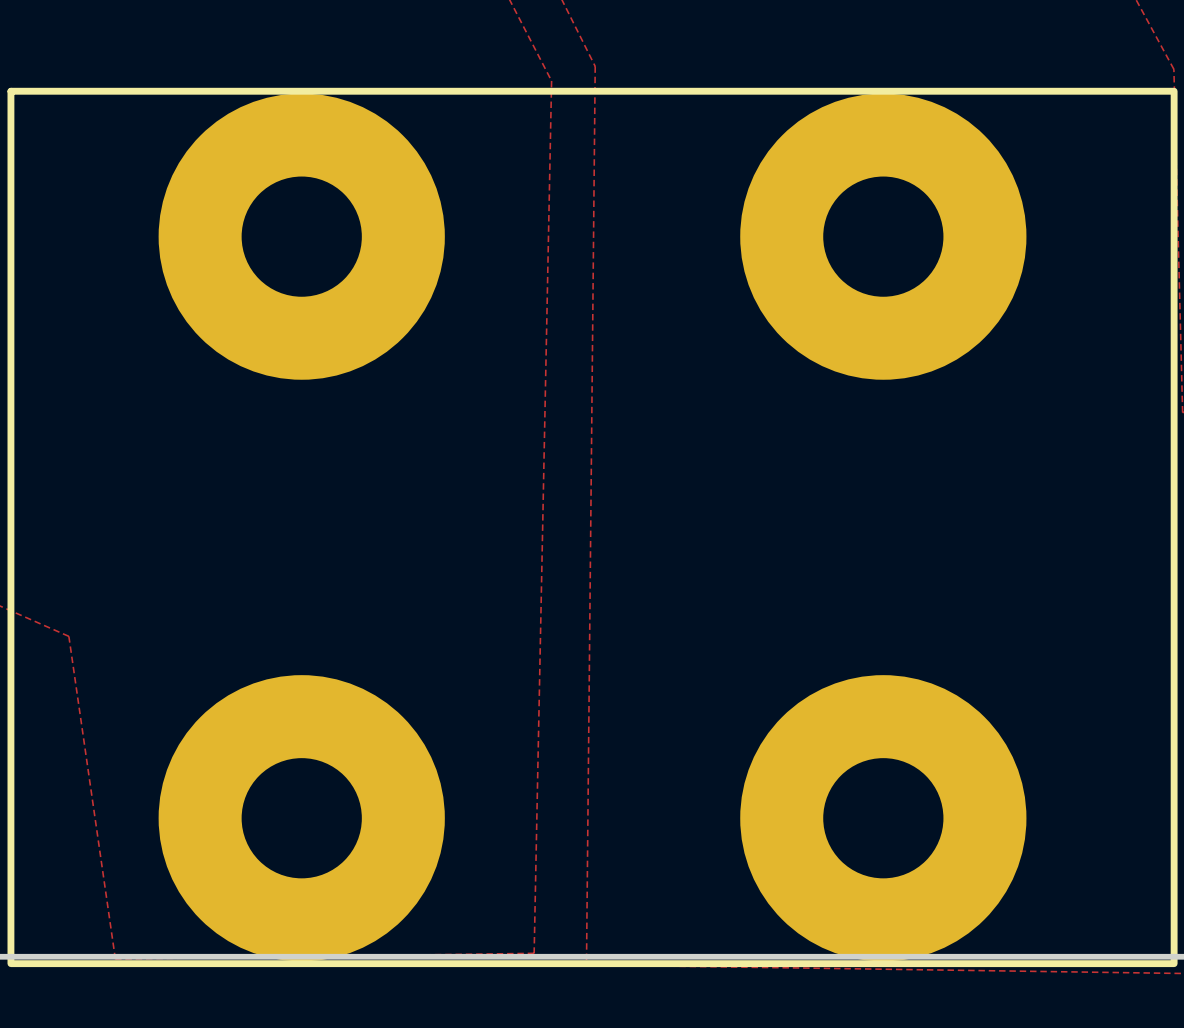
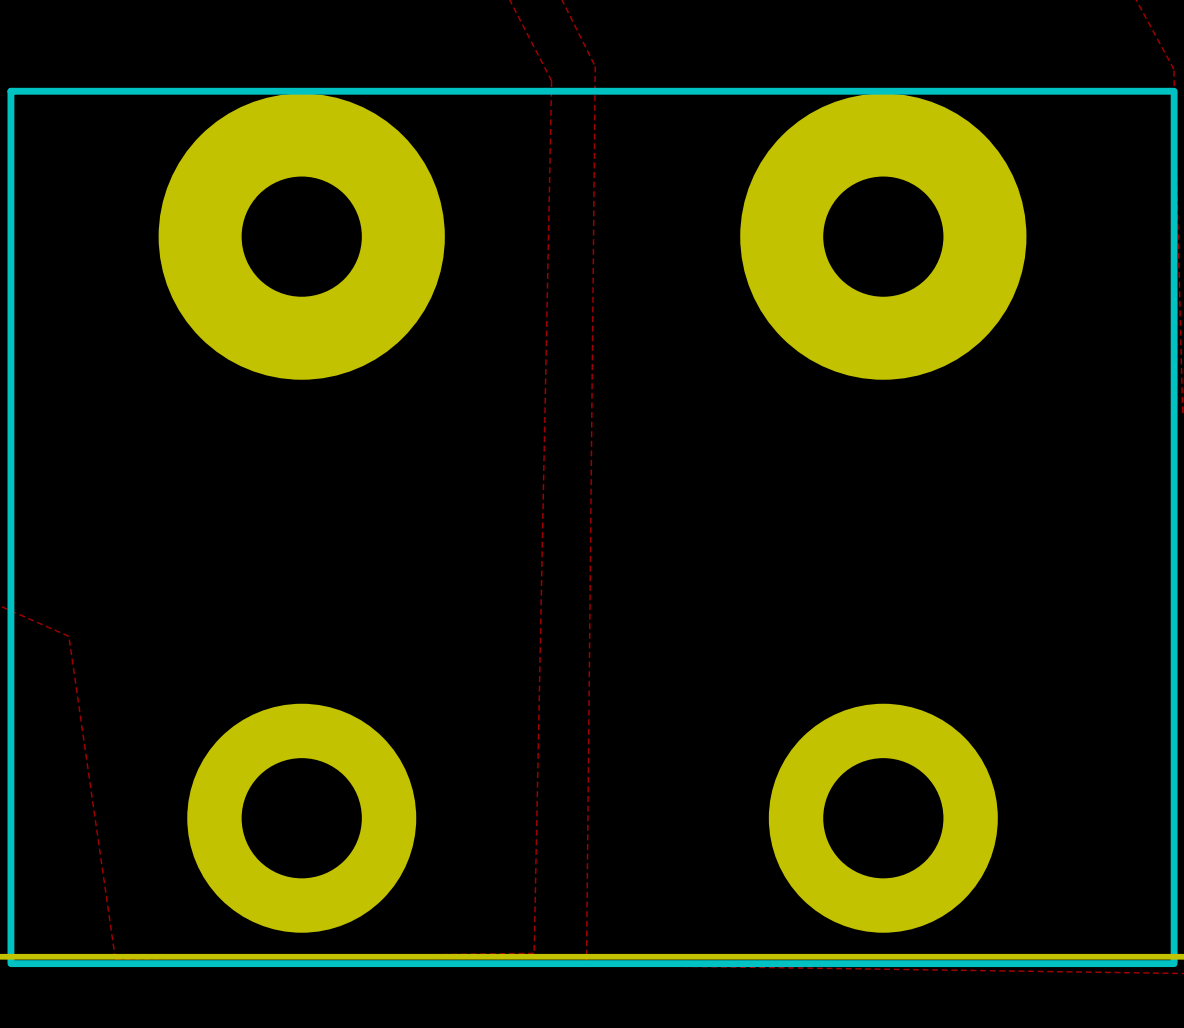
part footprint: [7, 87, 1178, 968] -> [7, 87, 1178, 968]

